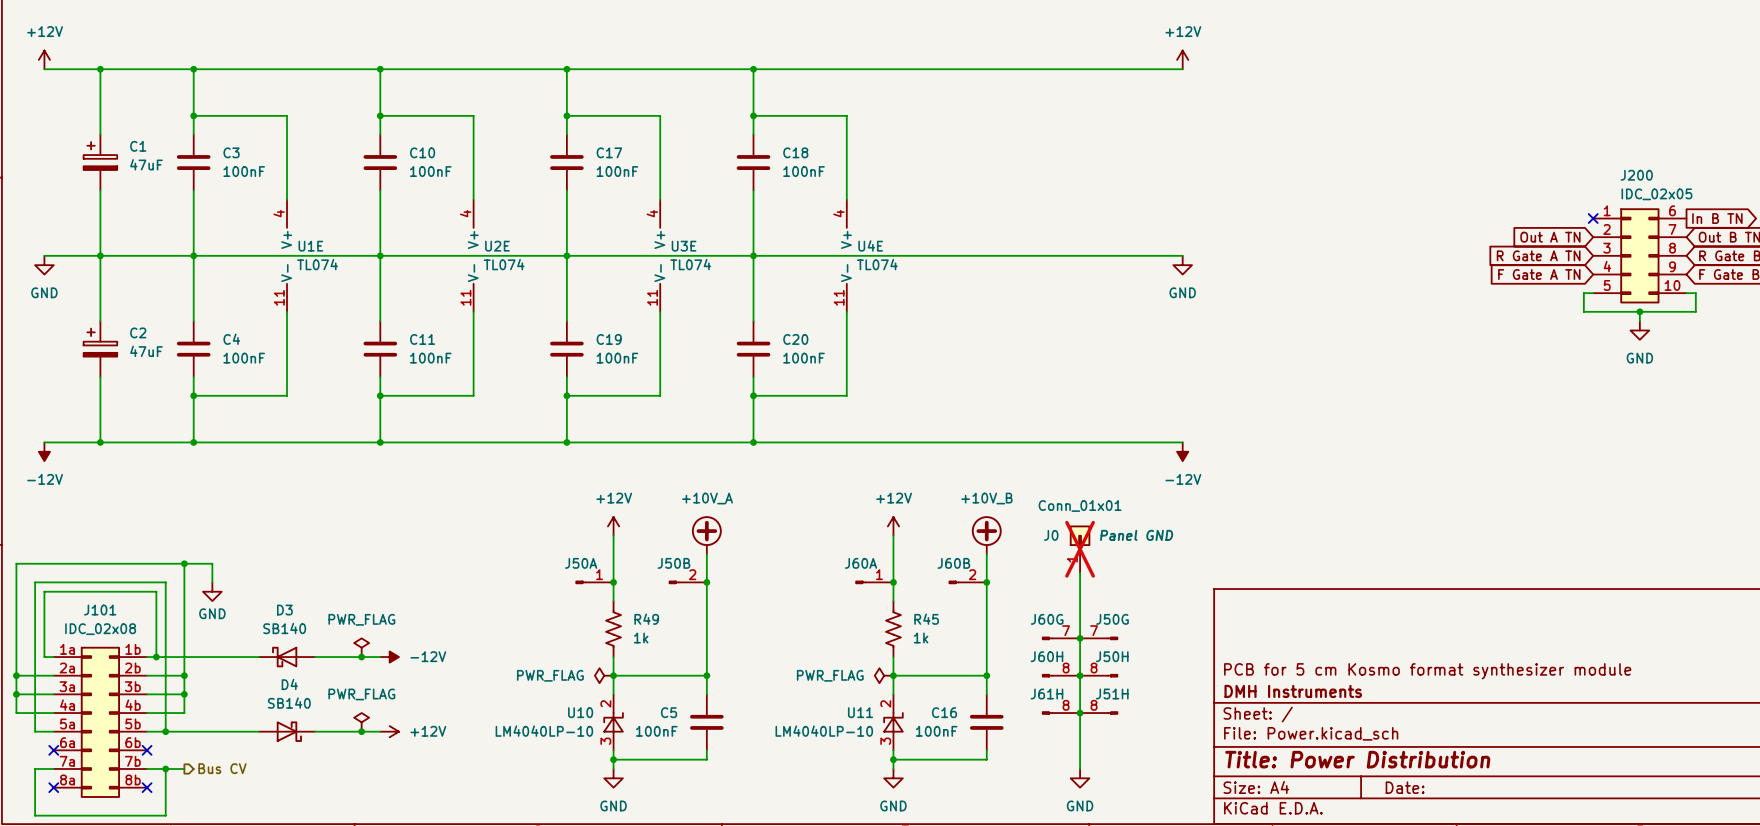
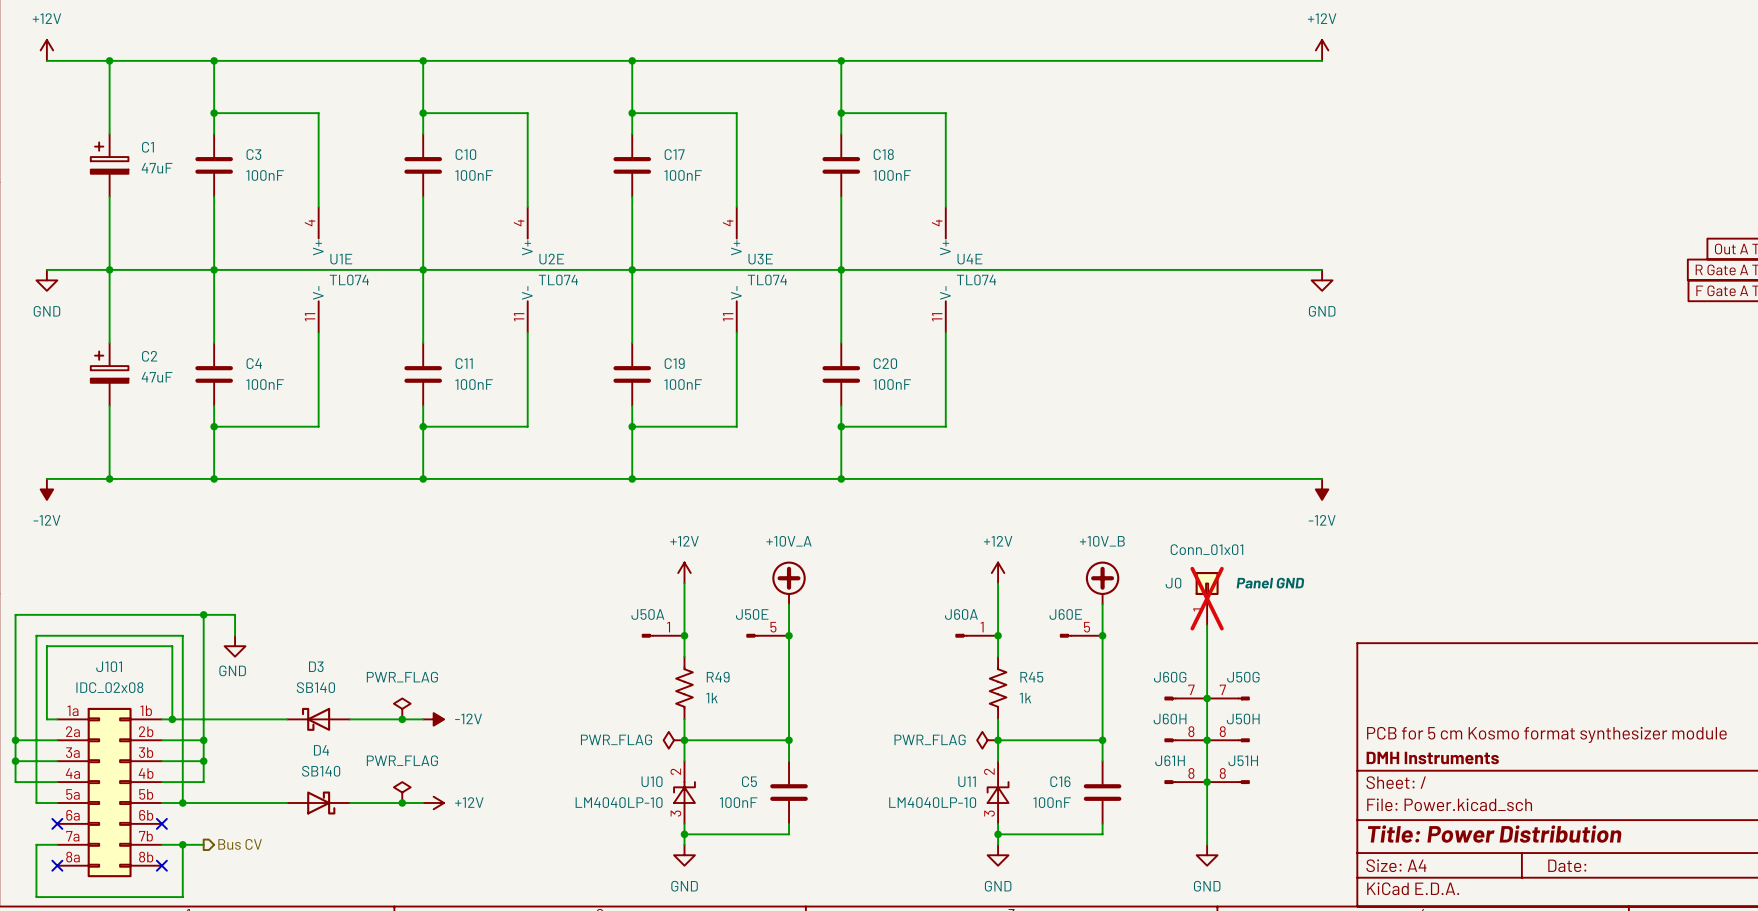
J50B name: J50B (673, 563) -> J50E (752, 614)
J60B name: J60B (953, 563) -> J60E (1065, 614)
J50B pin number: 2 (692, 574) -> 5 (773, 627)
J60B pin number: 2 (972, 574) -> 5 (1087, 627)

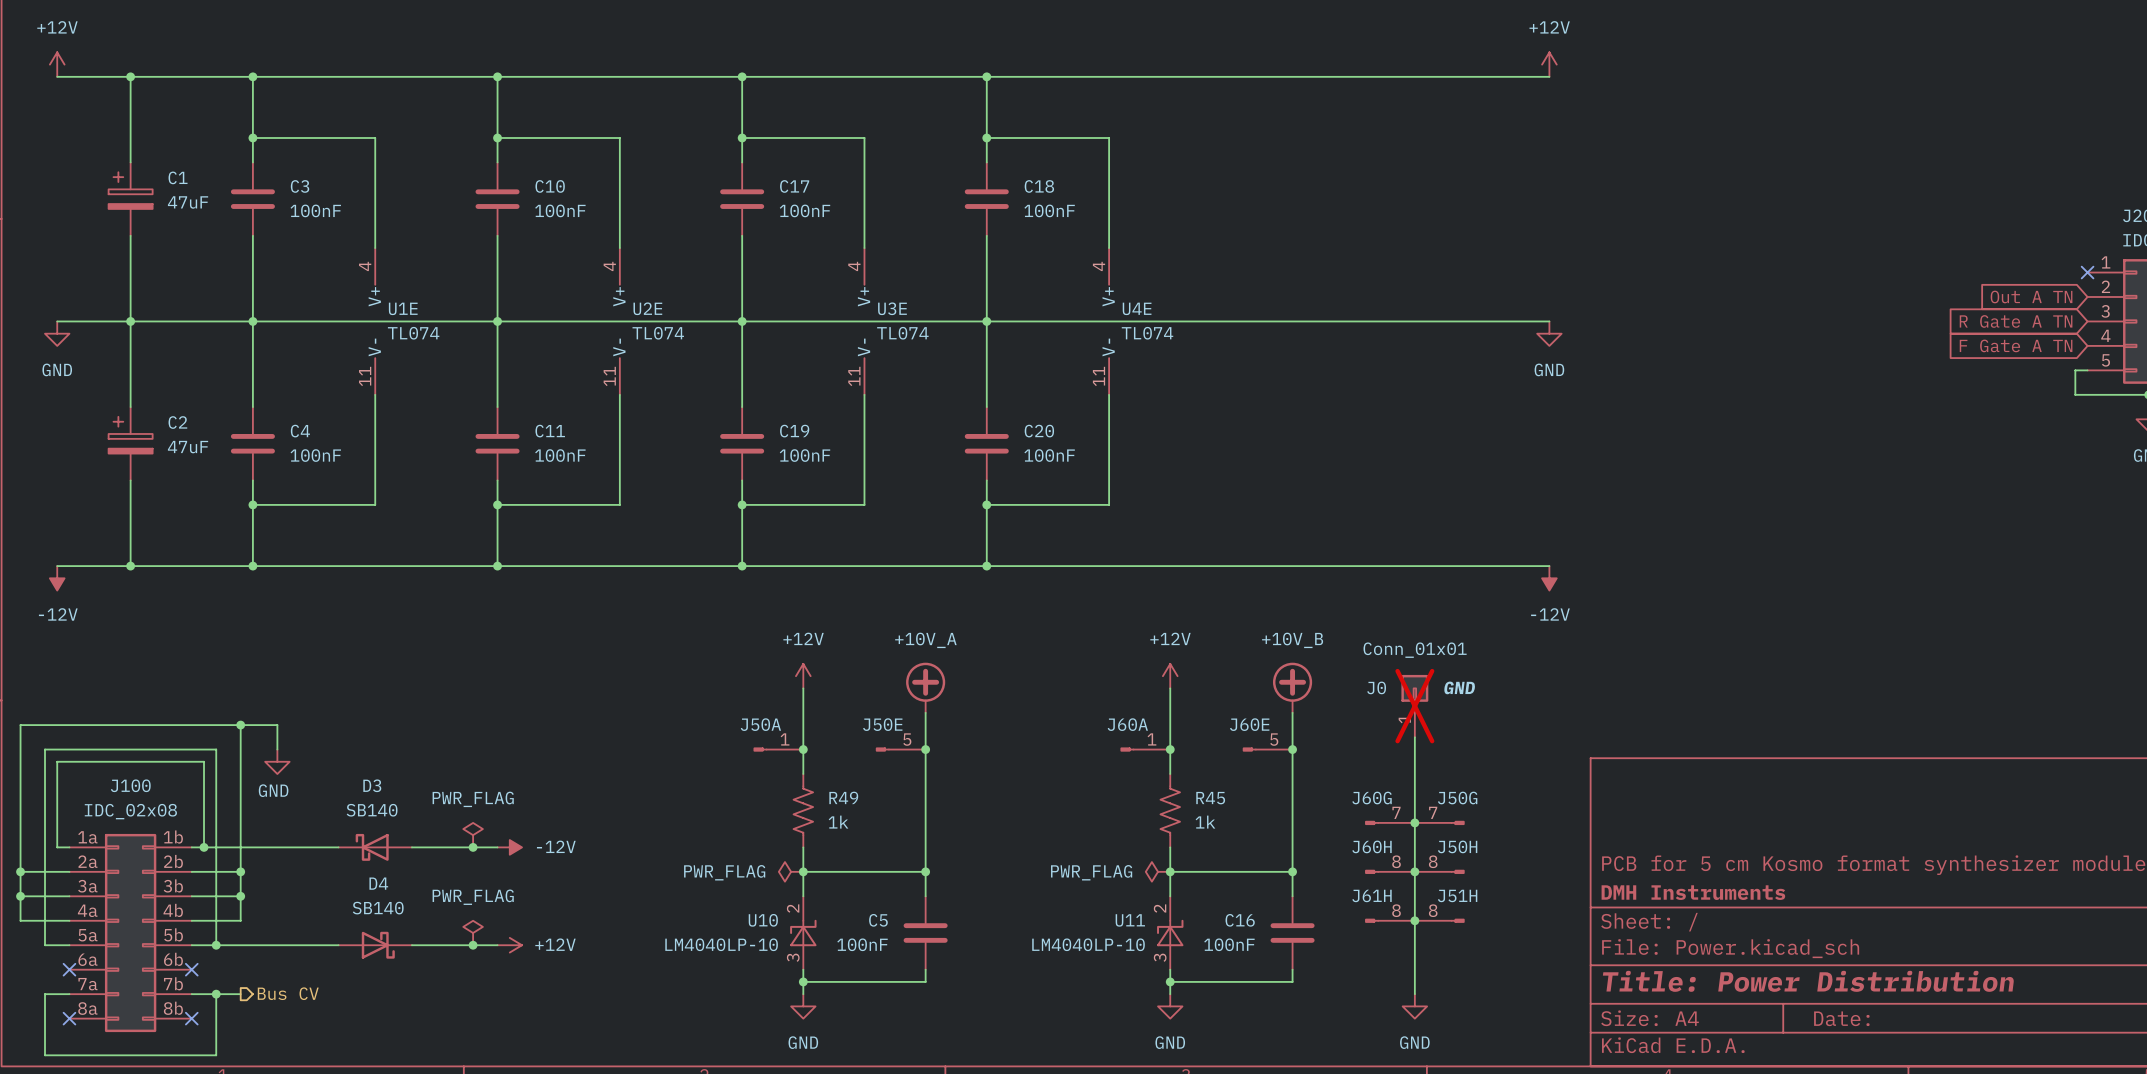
J0 text: Panel GND (1270, 583) -> GND (1459, 687)
J101 name: J101 (109, 666) -> J100 (130, 785)

